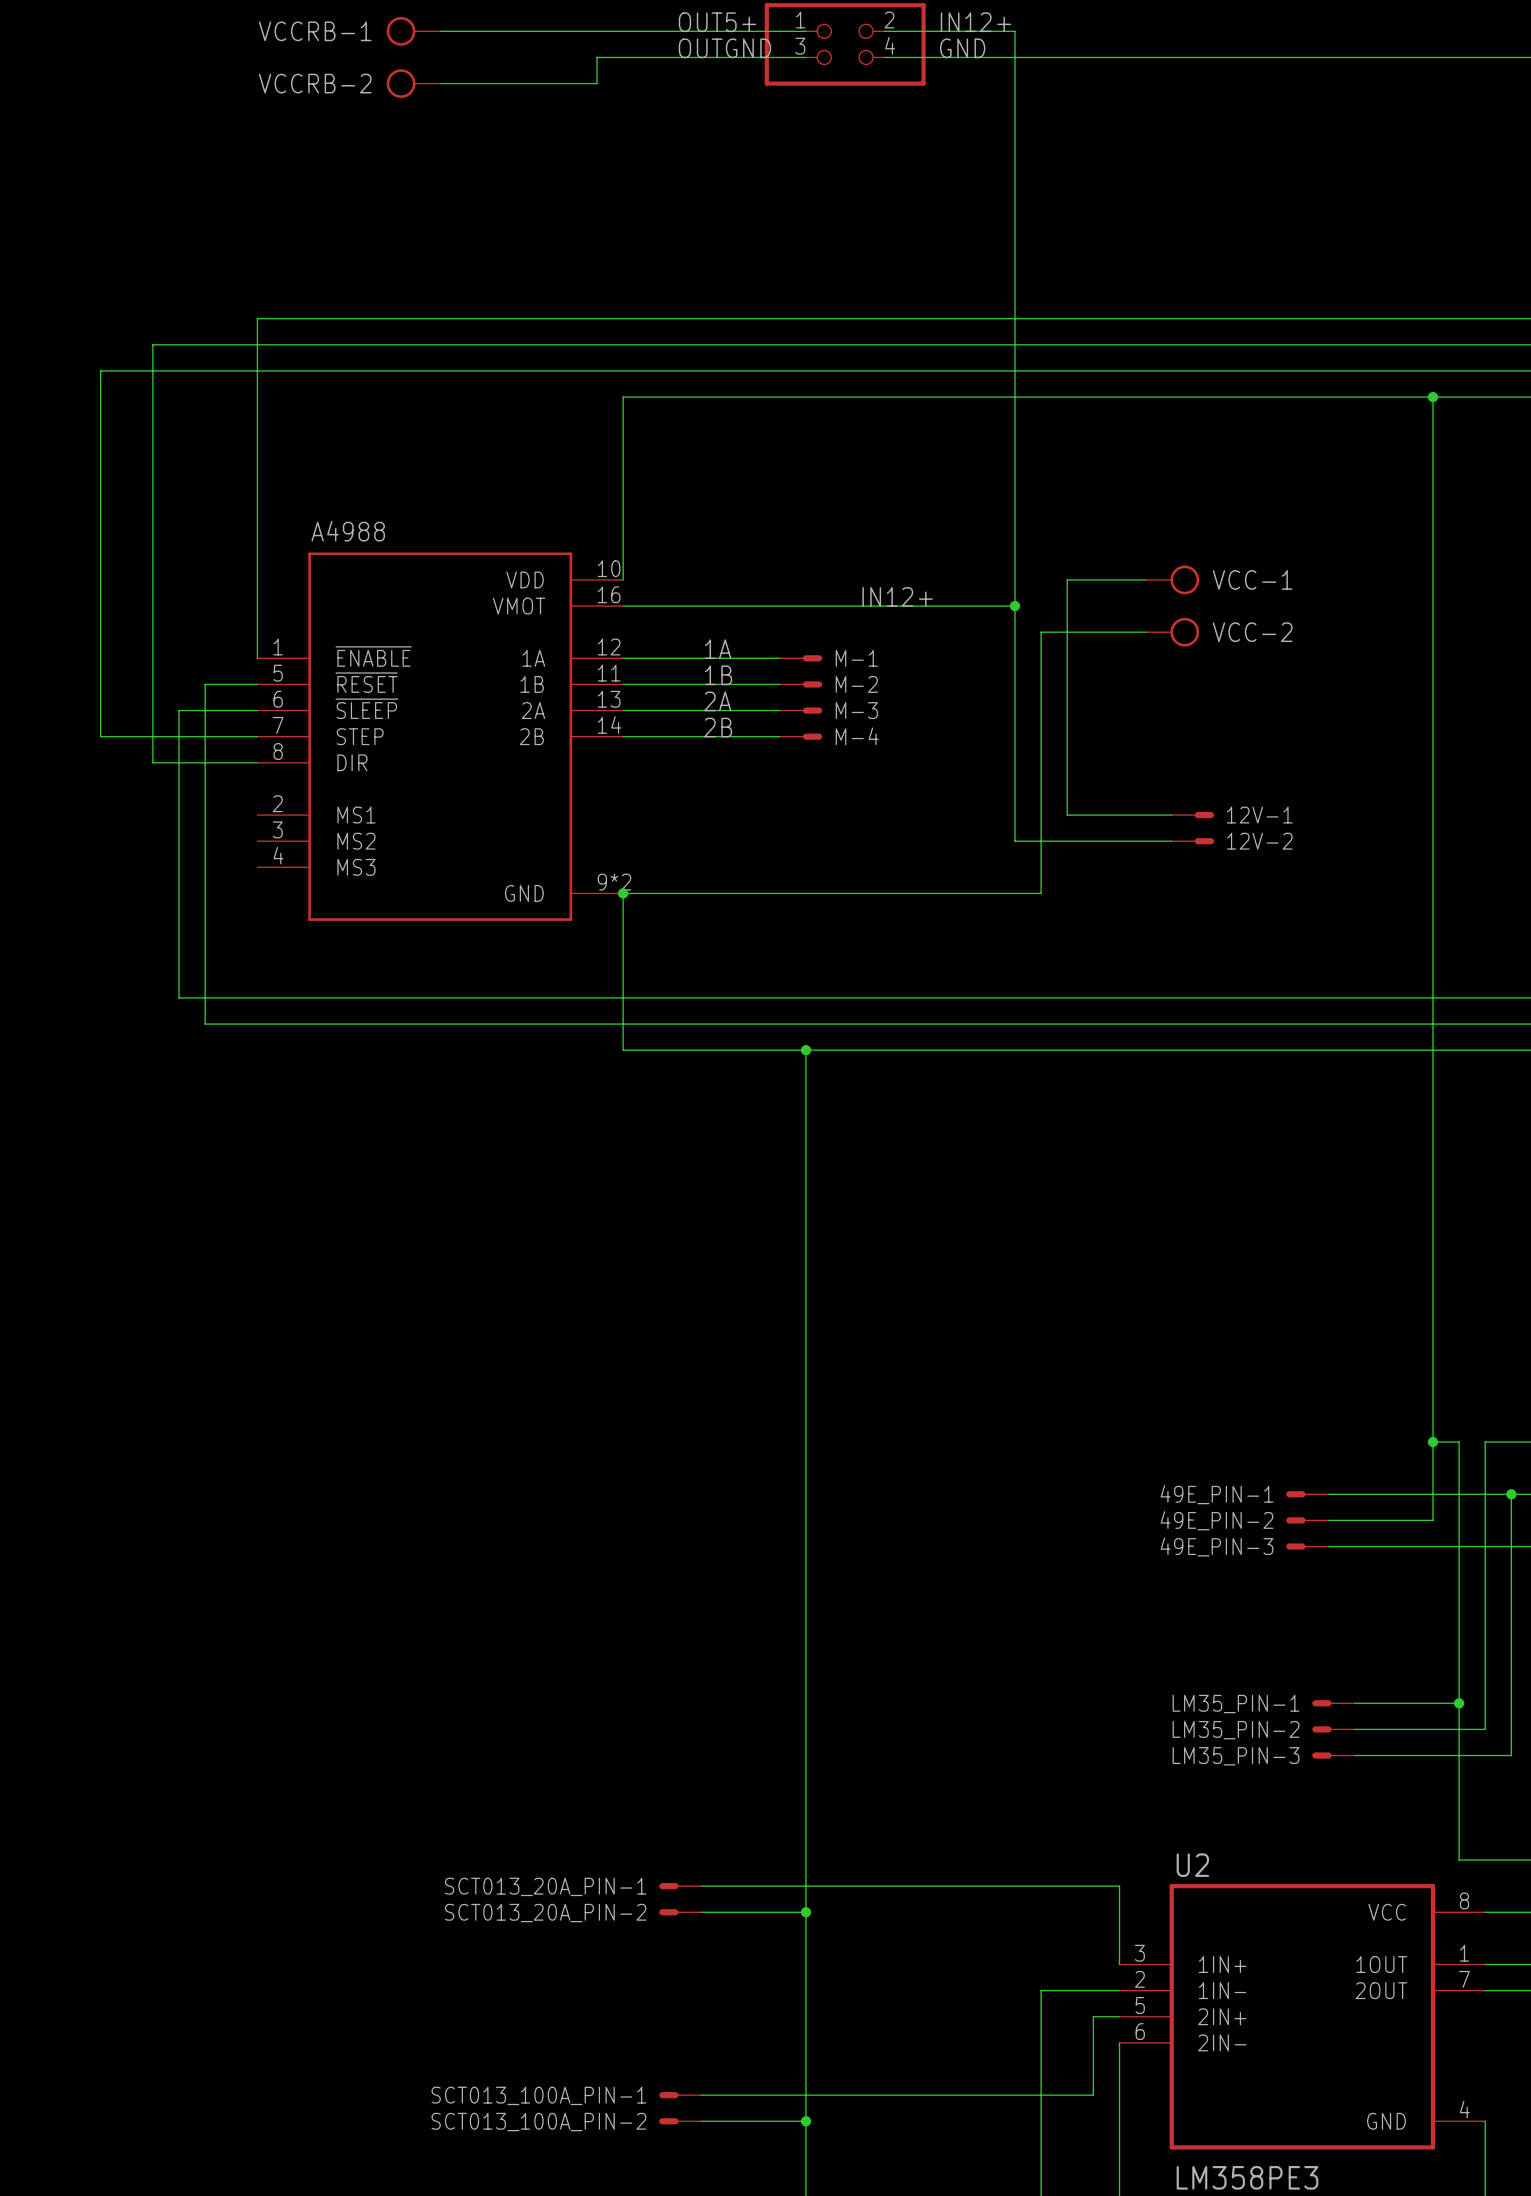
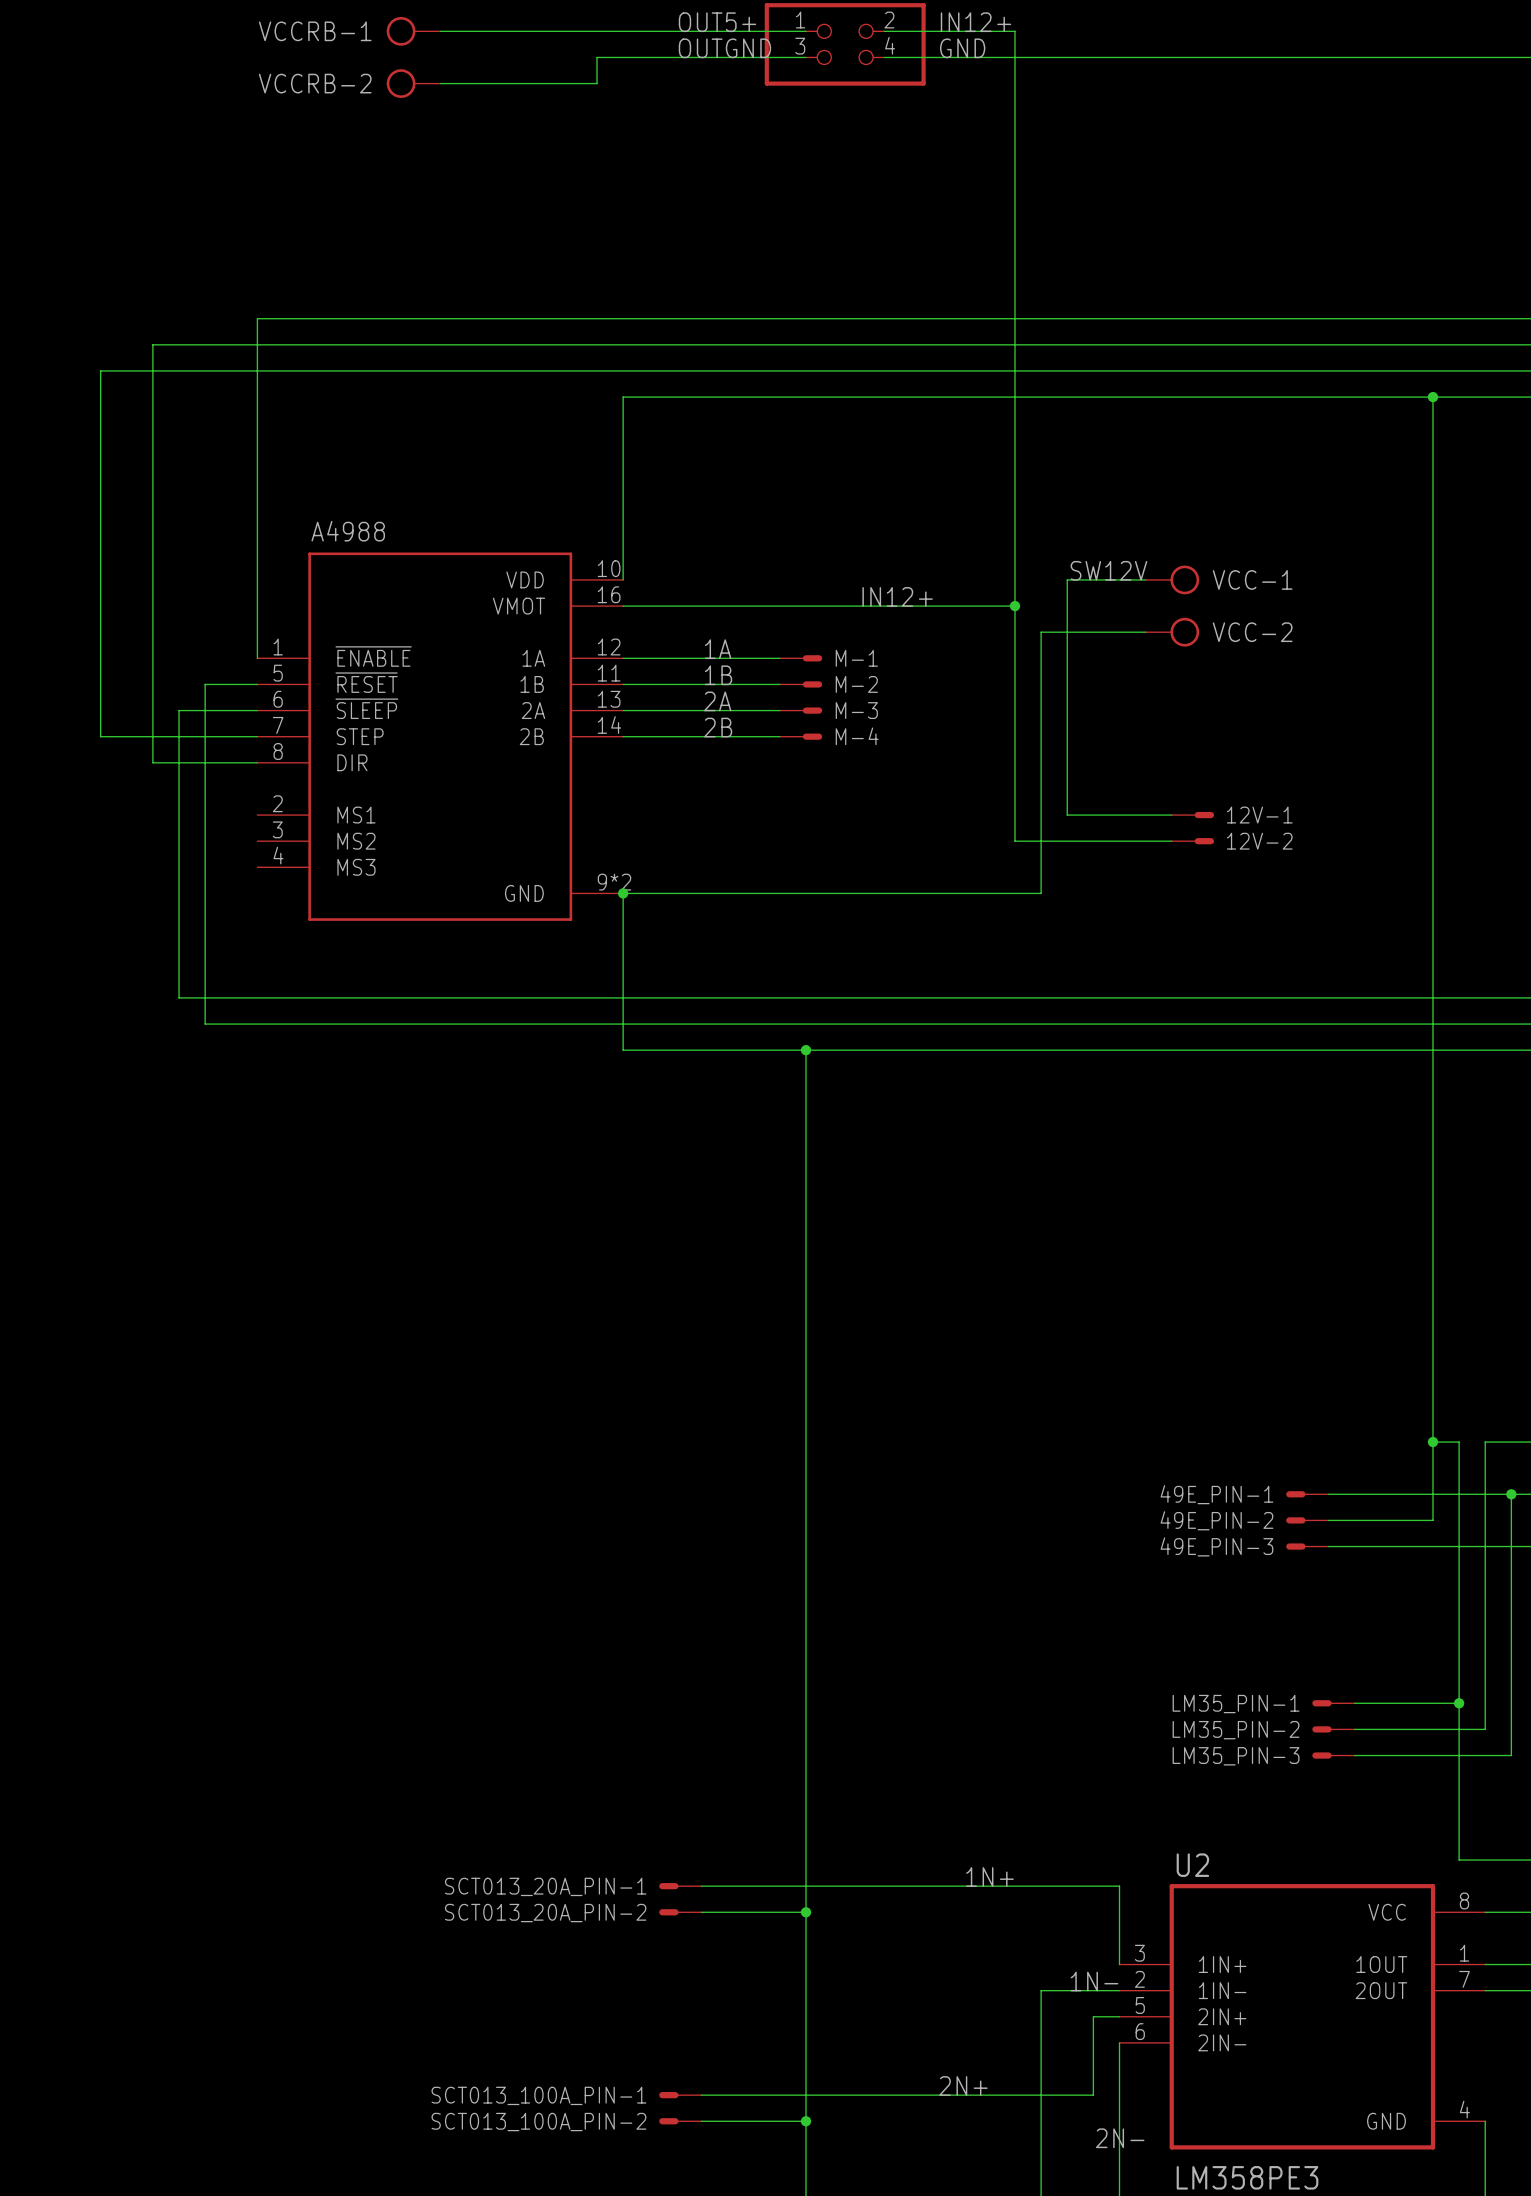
label: none -> SW12V (1108, 570)
label: none -> 1N+ (989, 1877)
label: none -> 1N- (1094, 1981)
label: none -> 2N+ (963, 2086)
label: none -> 2N- (1120, 2138)

